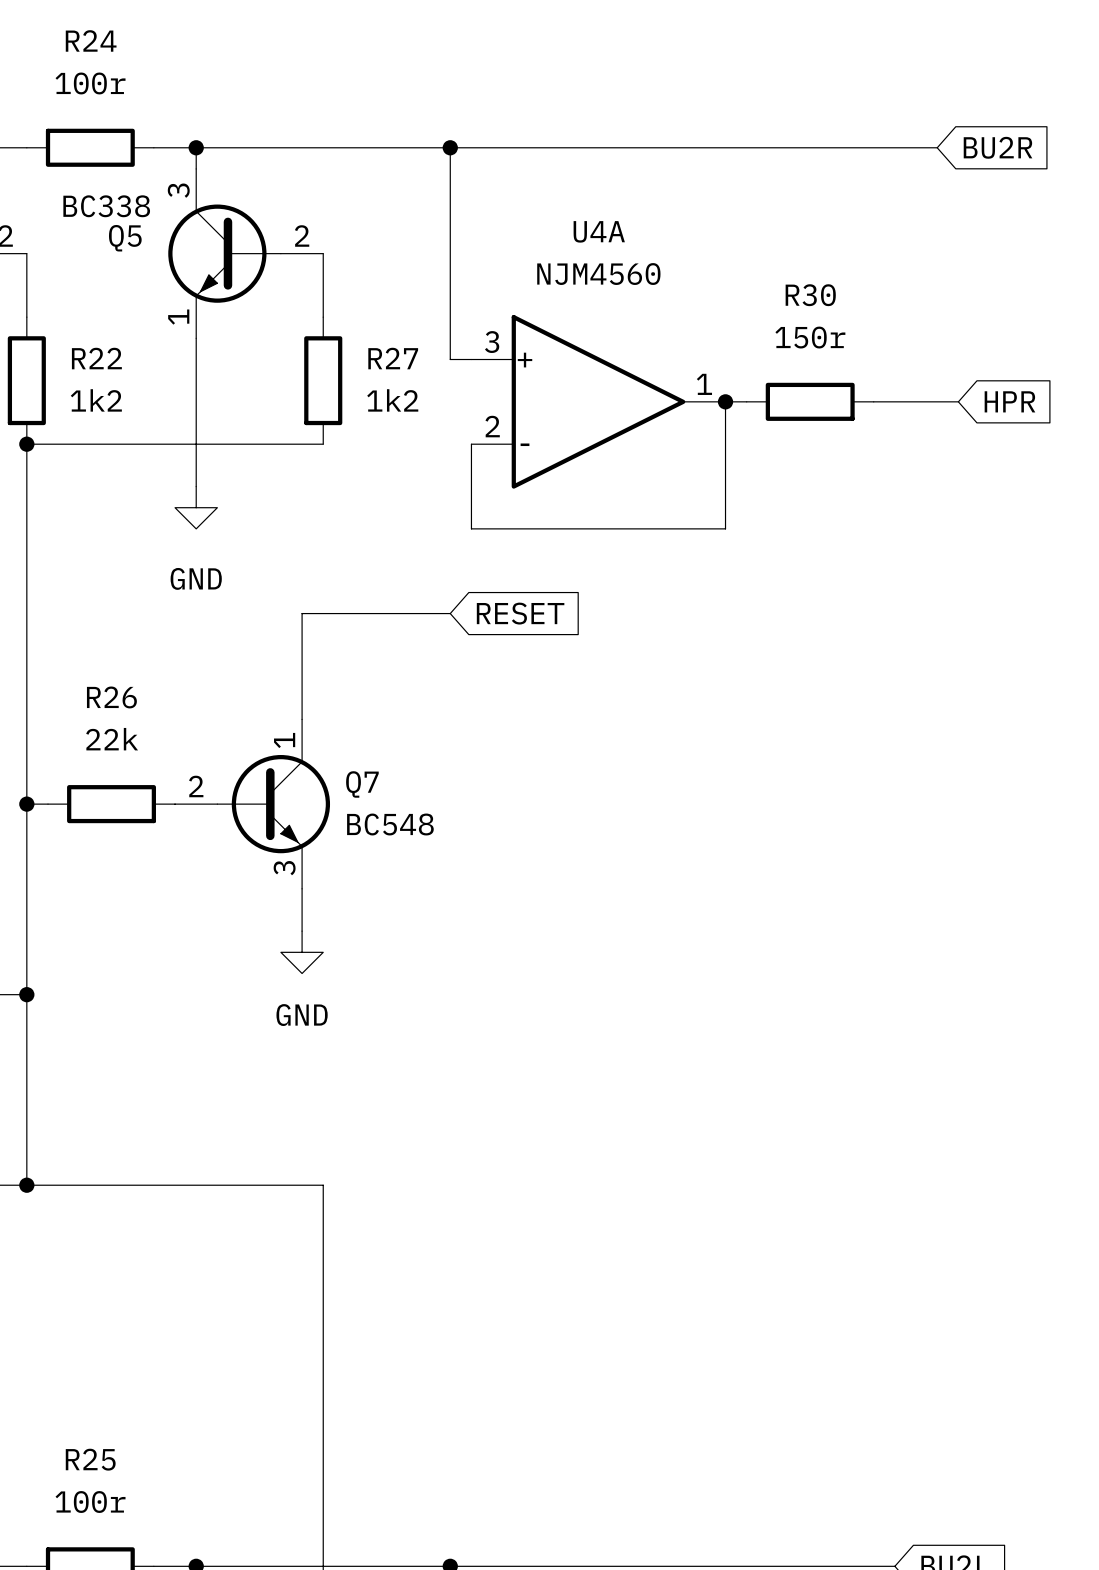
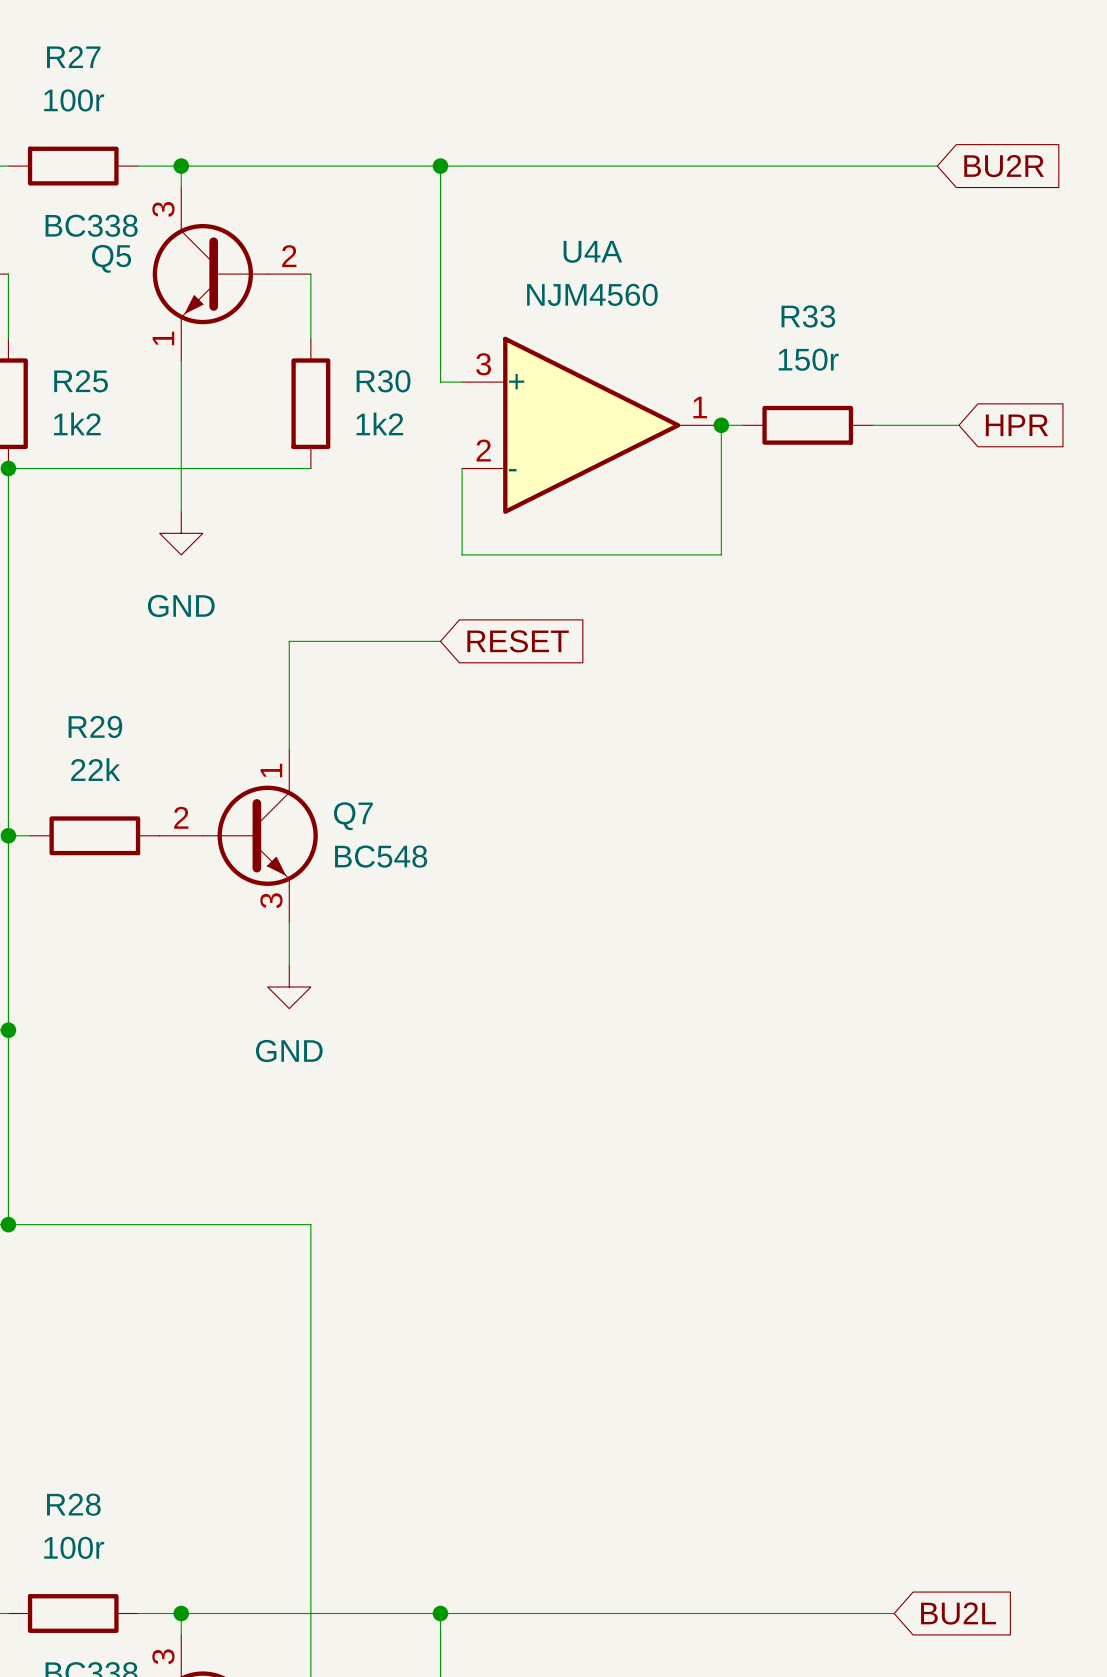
R24 name: R24 (91, 40) -> R27 (73, 57)
R30 name: R30 (810, 295) -> R33 (808, 316)
R22 name: R22 (96, 358) -> R25 (81, 381)
R27 name: R27 (393, 358) -> R30 (383, 381)
R26 name: R26 (111, 697) -> R29 (95, 726)
R25 name: R25 (90, 1459) -> R28 (73, 1504)

